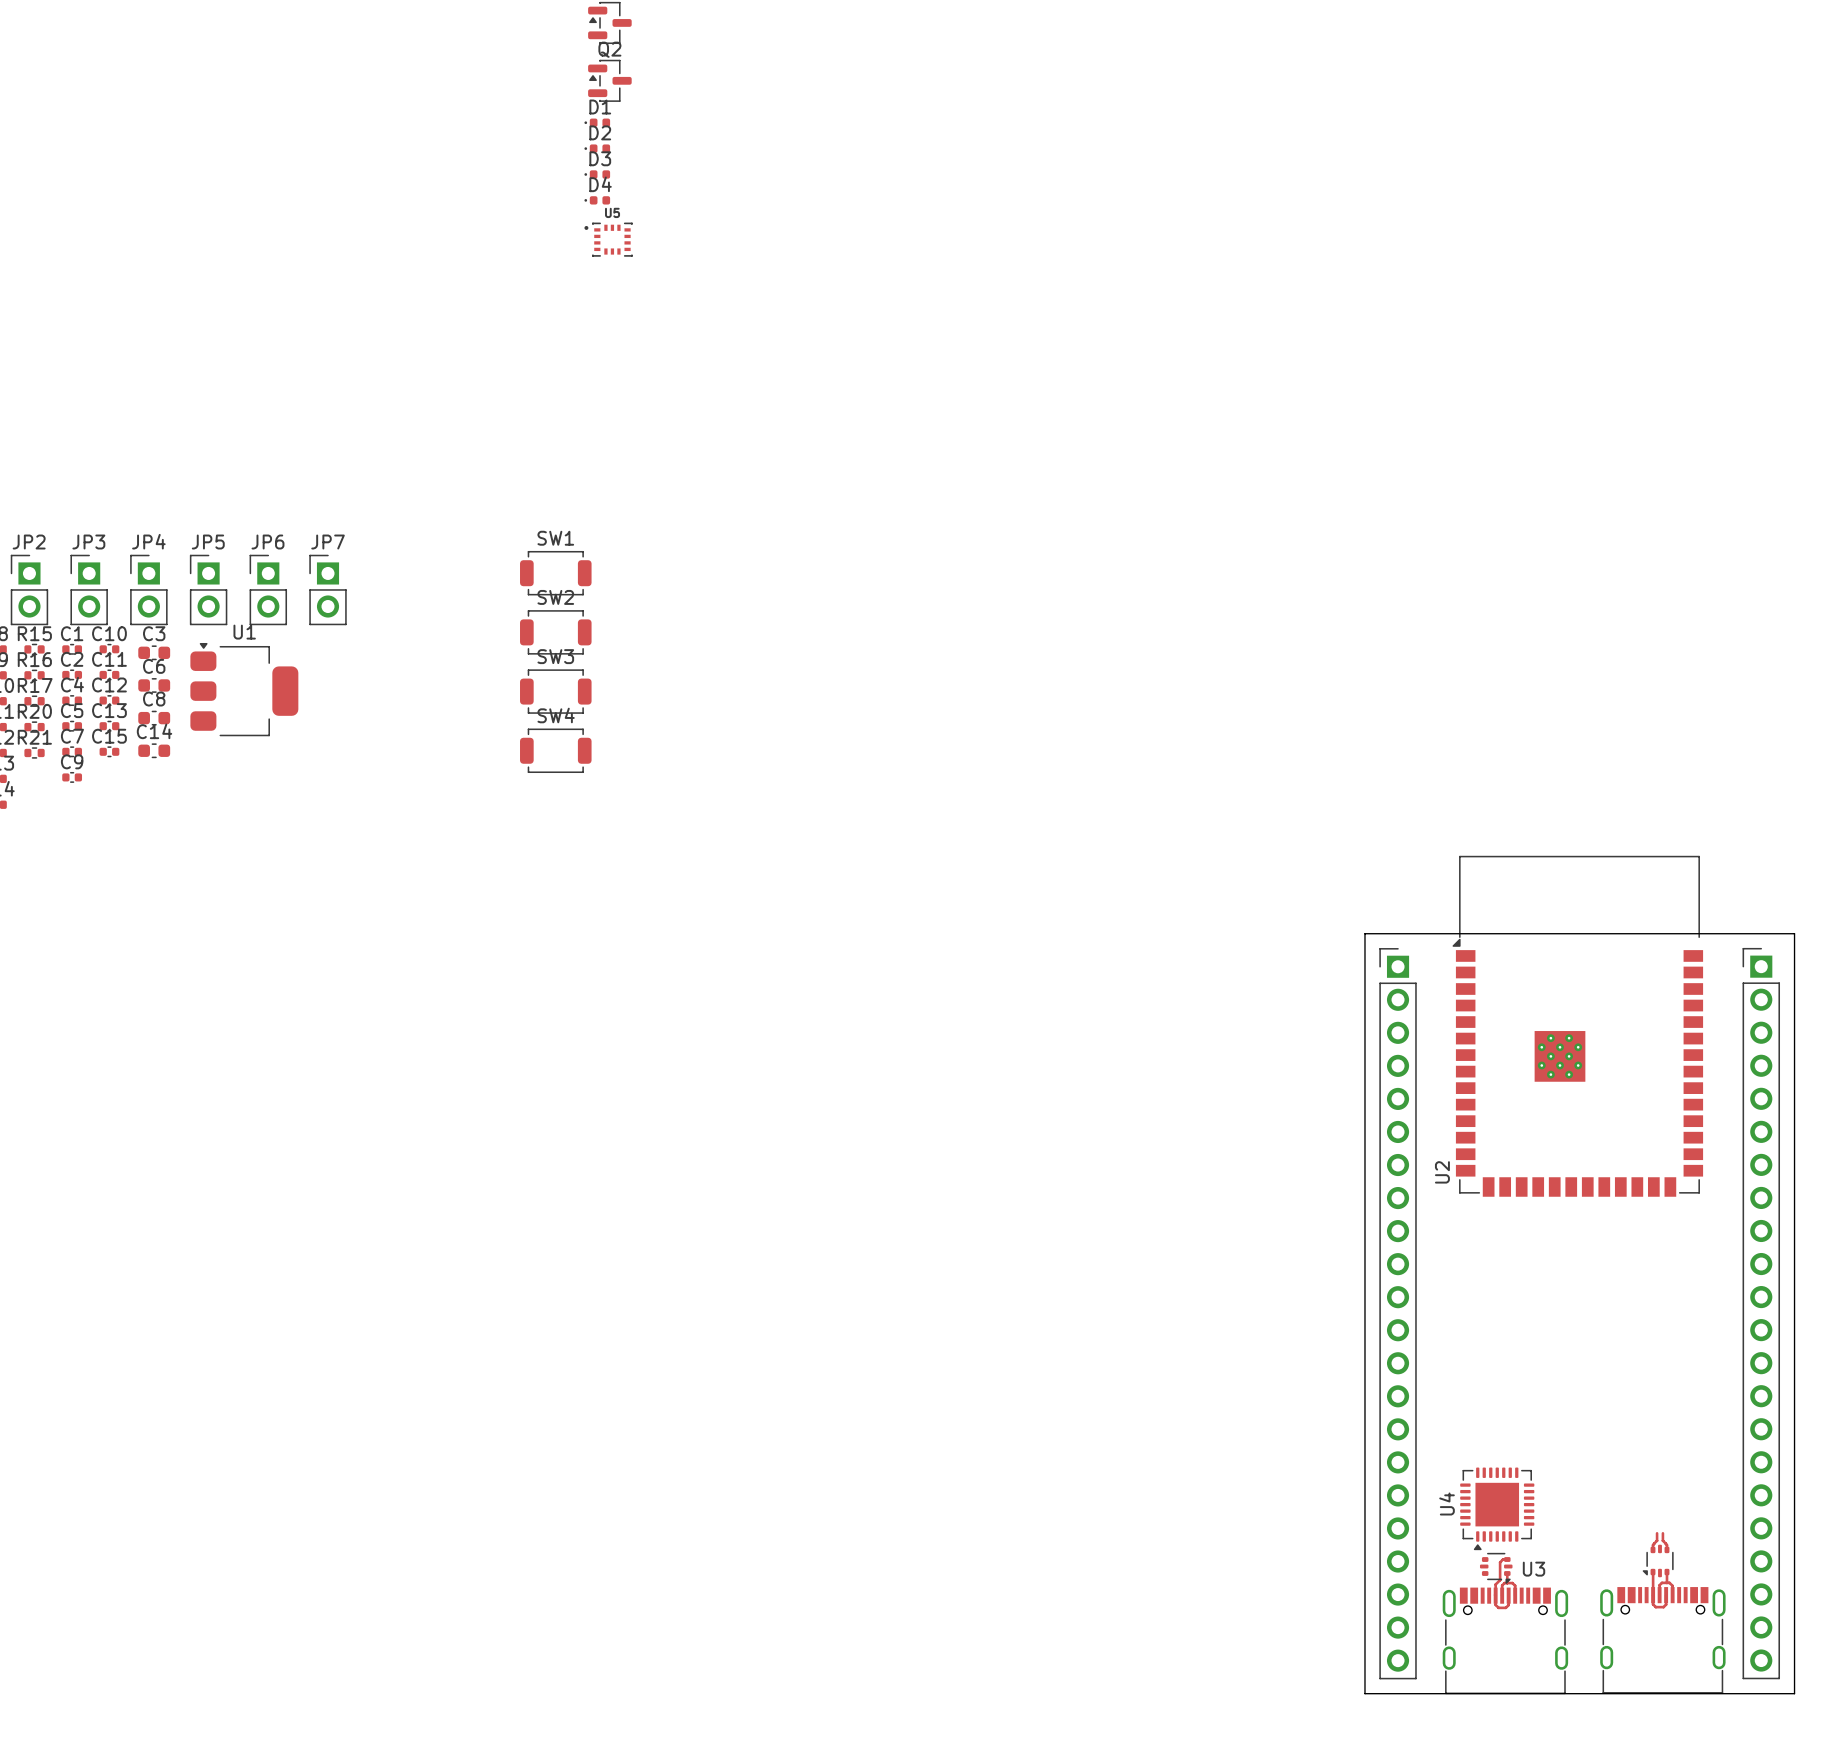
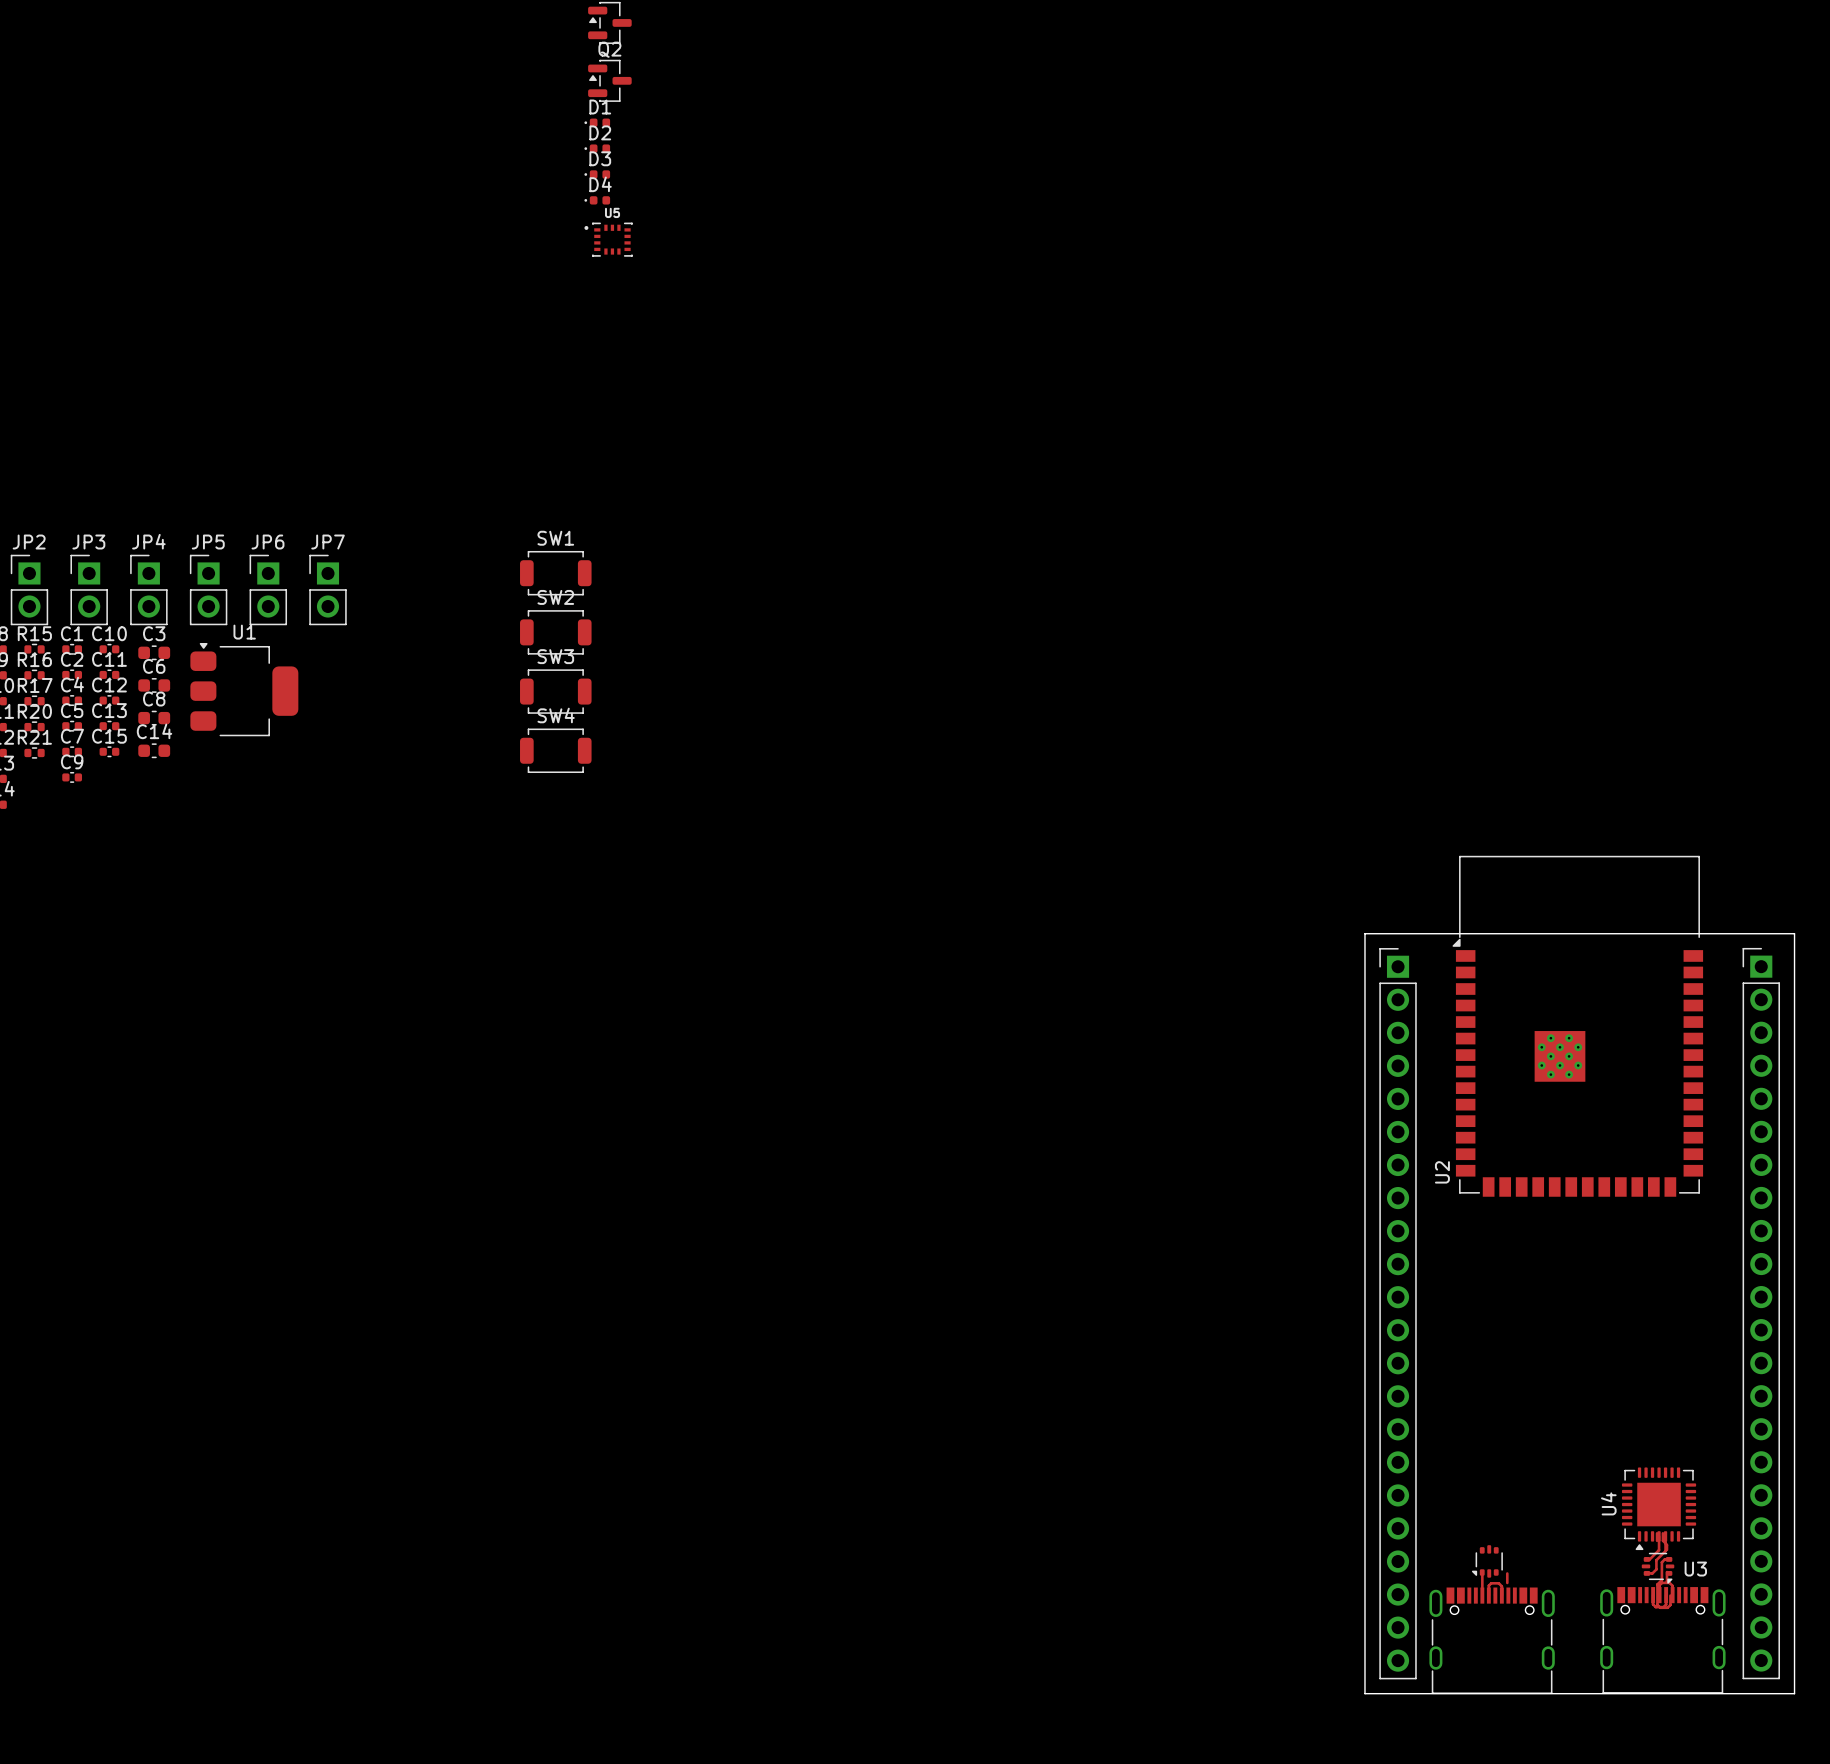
U4 position: (1497, 1508) -> (1659, 1508)
track: none -> (1659, 1536) (1659, 1550) (1649, 1559) (1646, 1559)
track: none -> (1665, 1536) (1665, 1551) (1656, 1560) (1656, 1569) (1652, 1573) (1646, 1573)
track: (1656, 1540) (1653, 1545) (1653, 1549) -> none
track: (1507, 1559) (1502, 1559) (1500, 1562) (1500, 1579) -> none
track: none -> (1669, 1559) (1664, 1559) (1661, 1562) (1661, 1579) (1657, 1584) (1657, 1604) (1660, 1607) (1667, 1607) (1670, 1604) (1670, 1595)
part position: (1658, 1560) -> (1487, 1561)
U3 position: (1496, 1568) -> (1658, 1568)
track: (1653, 1572) (1653, 1595) -> (1482, 1572) (1482, 1595)
track: (1500, 1580) (1495, 1584) (1495, 1604) (1498, 1607) (1505, 1607) (1508, 1605) (1508, 1595) -> none
track: (1502, 1595) (1502, 1585) (1504, 1583) (1512, 1583) (1515, 1585) (1515, 1595) -> (1501, 1595) (1501, 1586) (1498, 1583) (1491, 1583) (1488, 1585) (1488, 1595)
part position: (1505, 1640) -> (1492, 1640)

